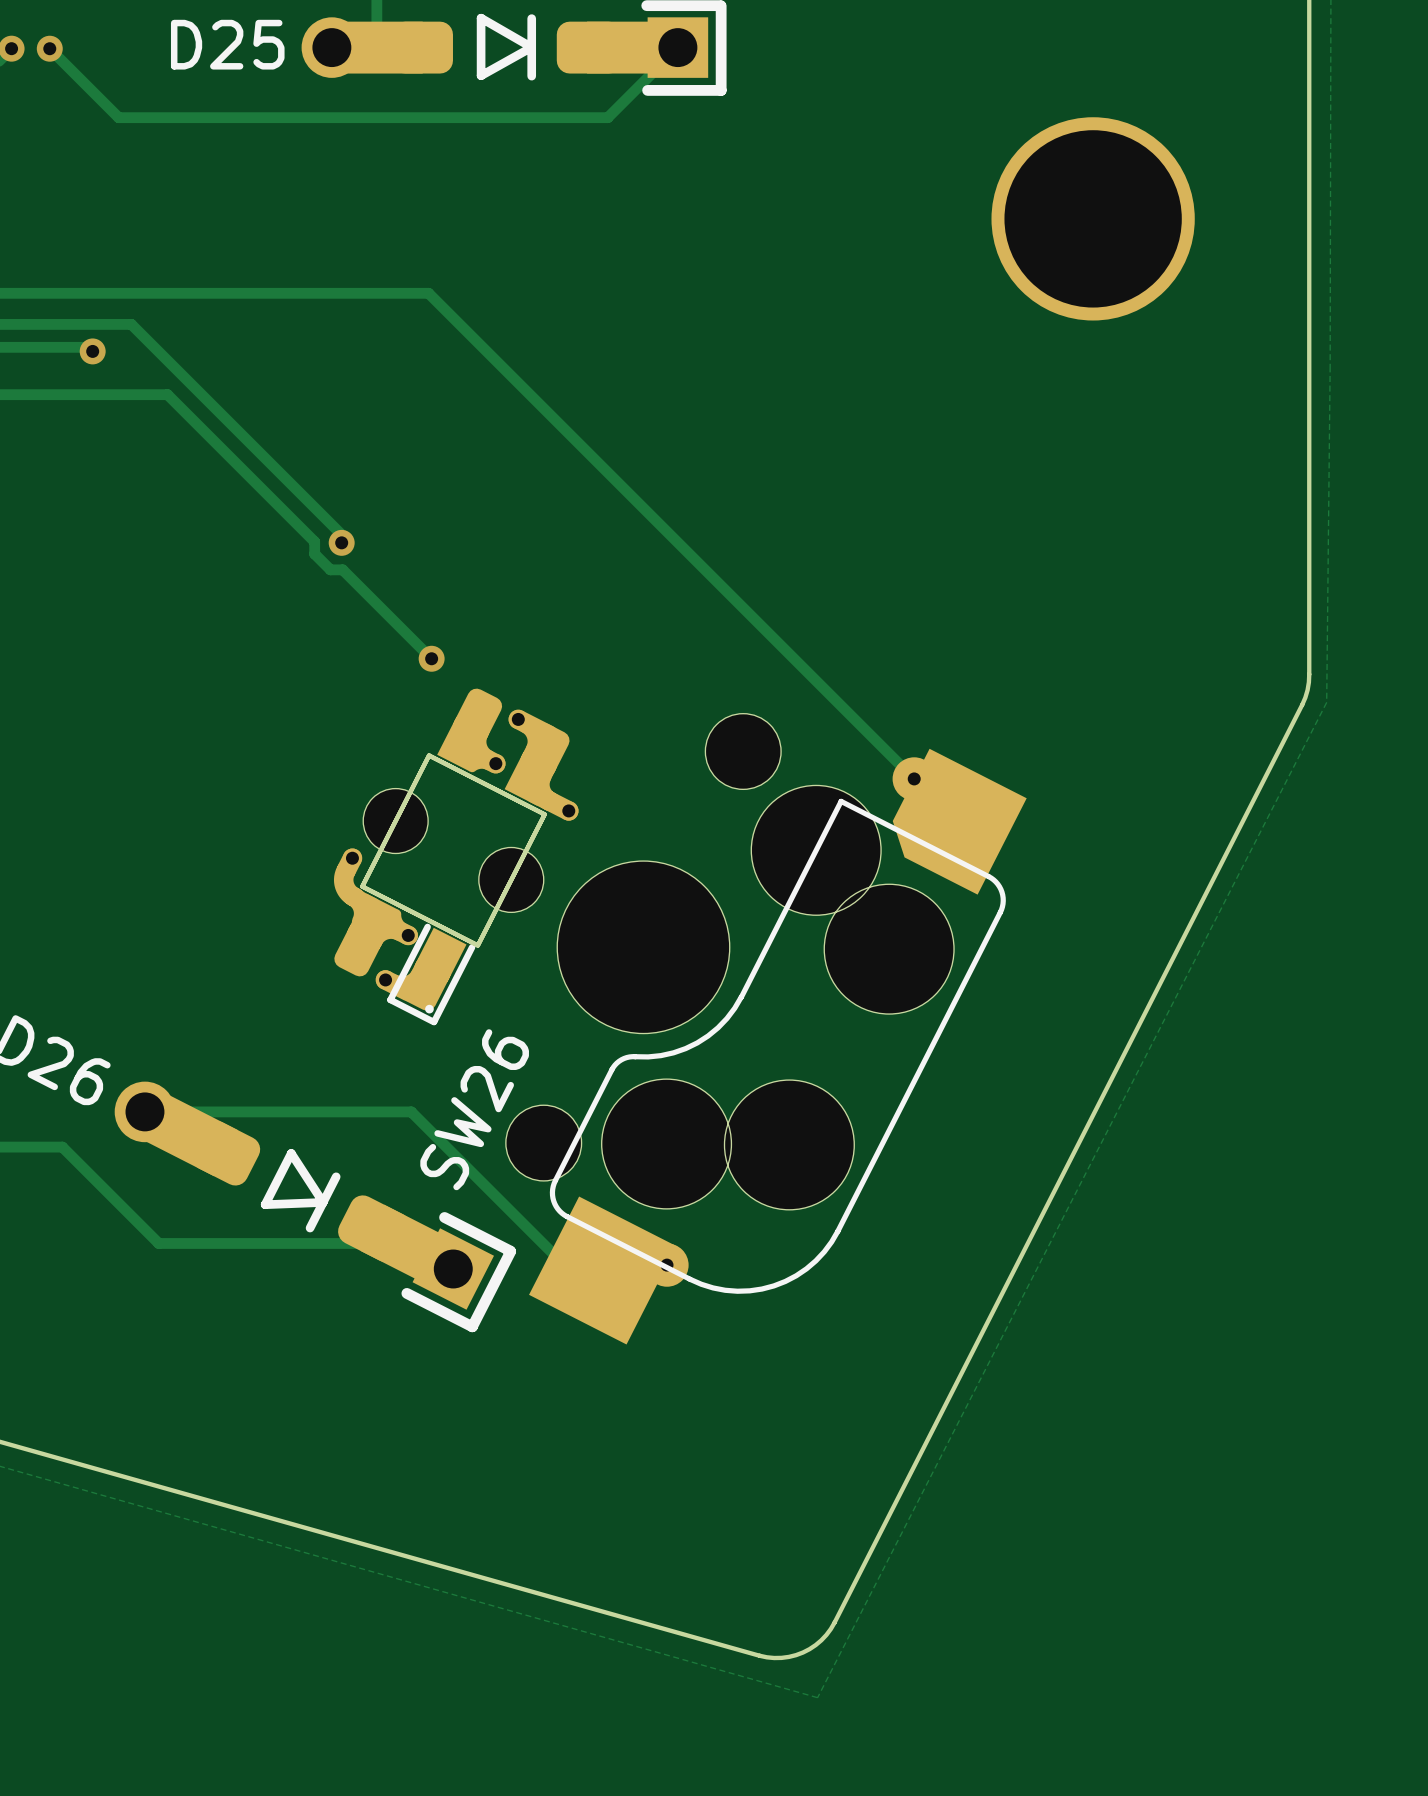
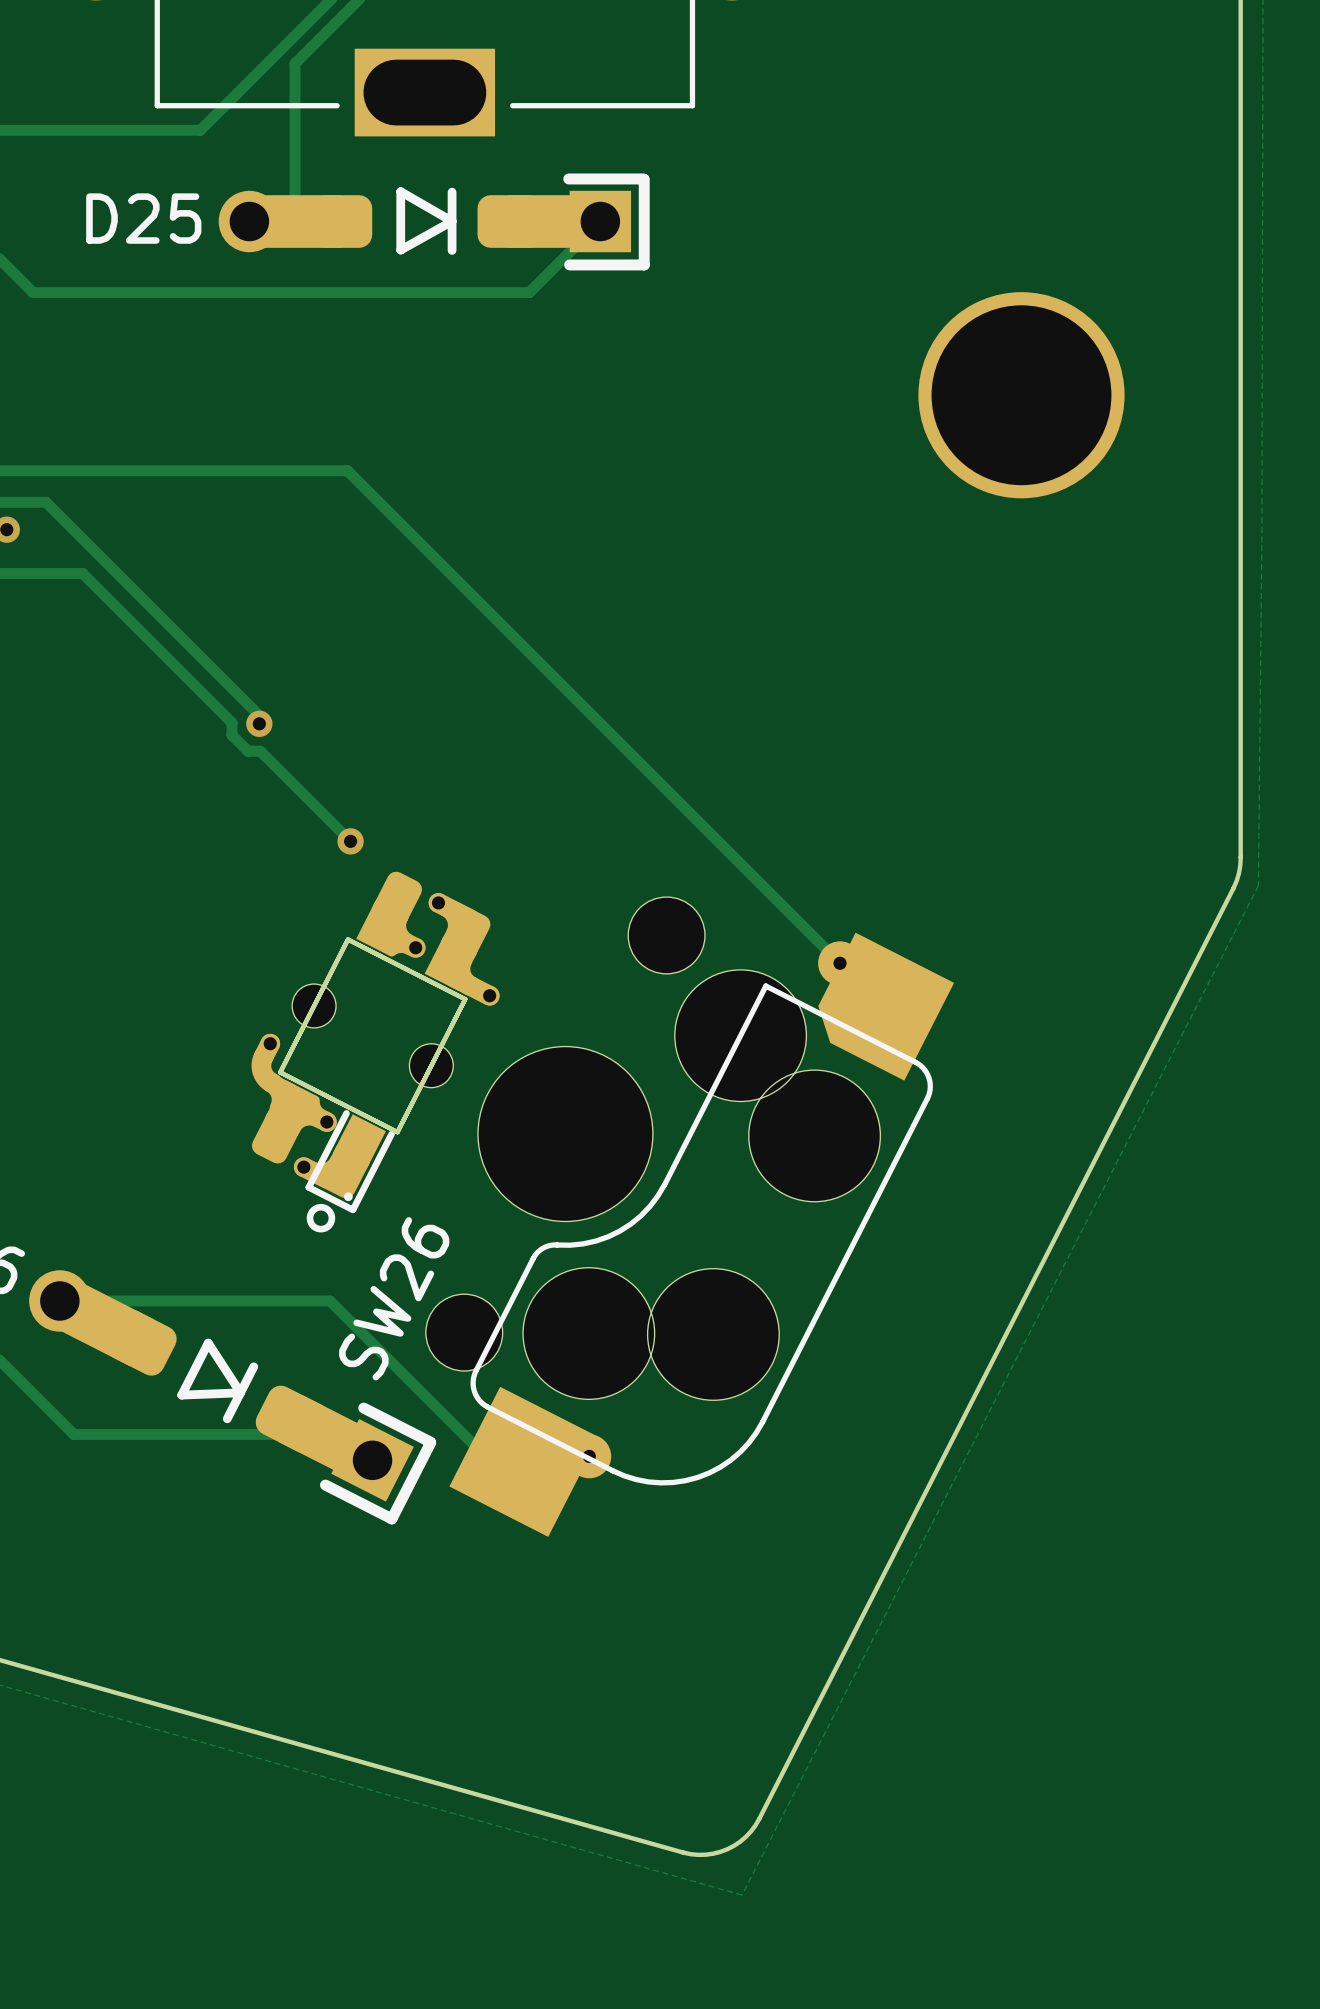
SW26 footprint: [333, 688, 1027, 1345] -> [251, 871, 955, 1537]

